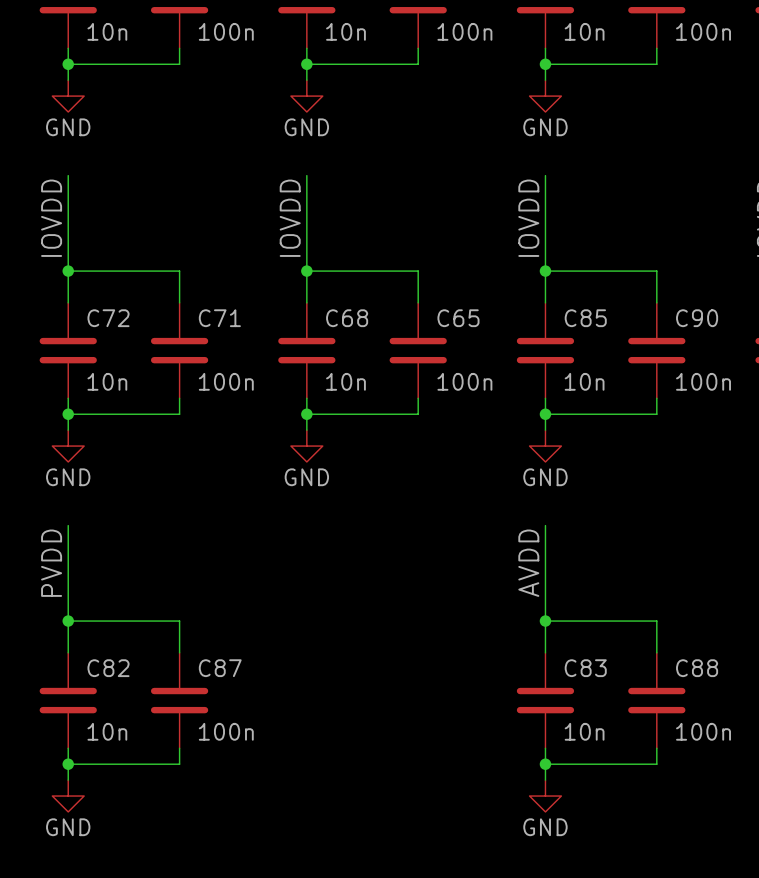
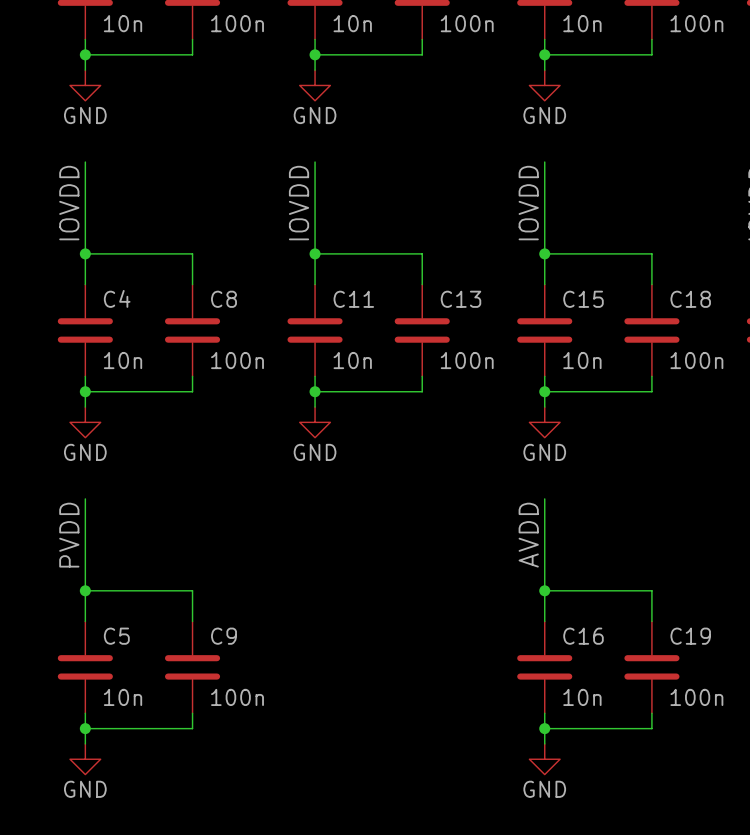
C72 name: C72 (108, 318) -> C4 (117, 298)
C71 name: C71 (219, 318) -> C8 (224, 299)
C68 name: C68 (347, 318) -> C11 (353, 299)
C65 name: C65 (458, 318) -> C13 (461, 299)
C85 name: C85 (585, 318) -> C15 (583, 299)
C90 name: C90 (697, 318) -> C18 (690, 299)
C82 name: C82 (108, 668) -> C5 (116, 636)
C87 name: C87 (220, 668) -> C9 (224, 636)
C83 name: C83 (585, 668) -> C16 (583, 636)
C88 name: C88 (697, 668) -> C19 (690, 636)

